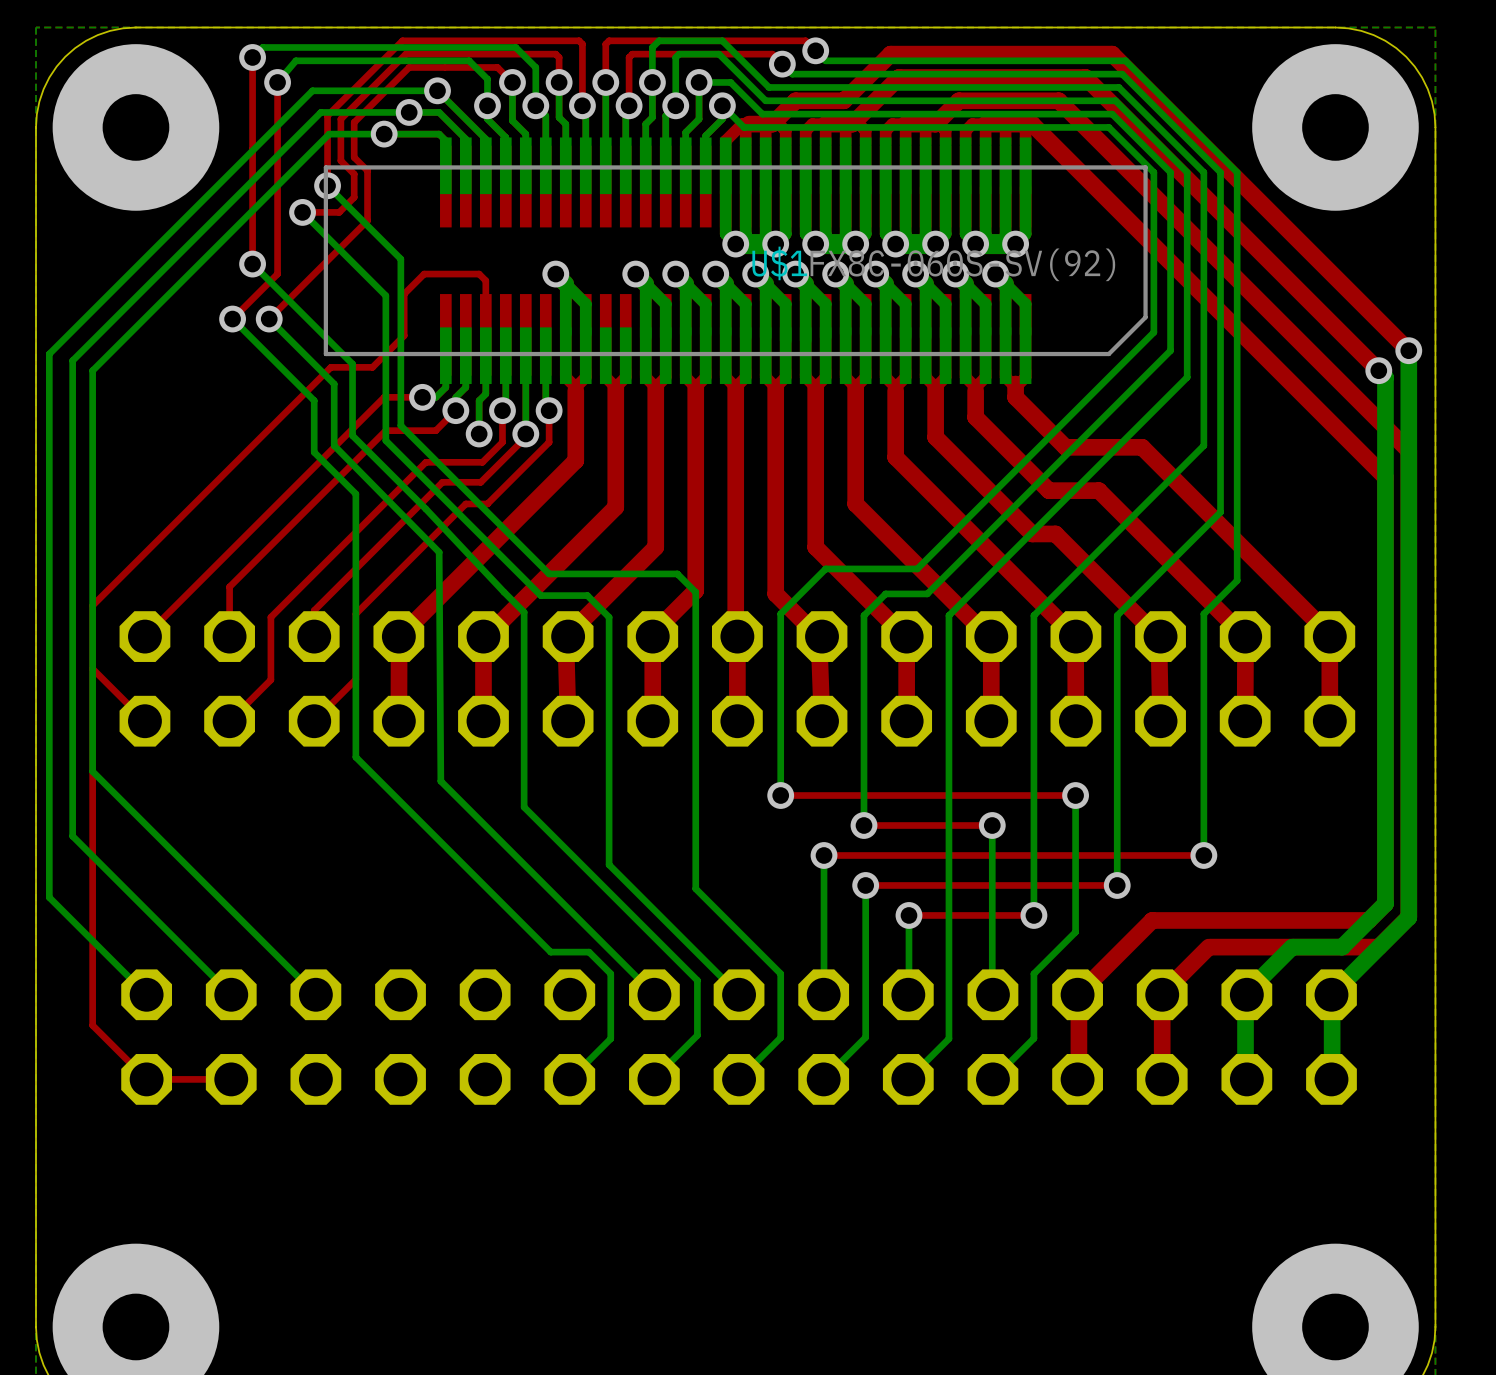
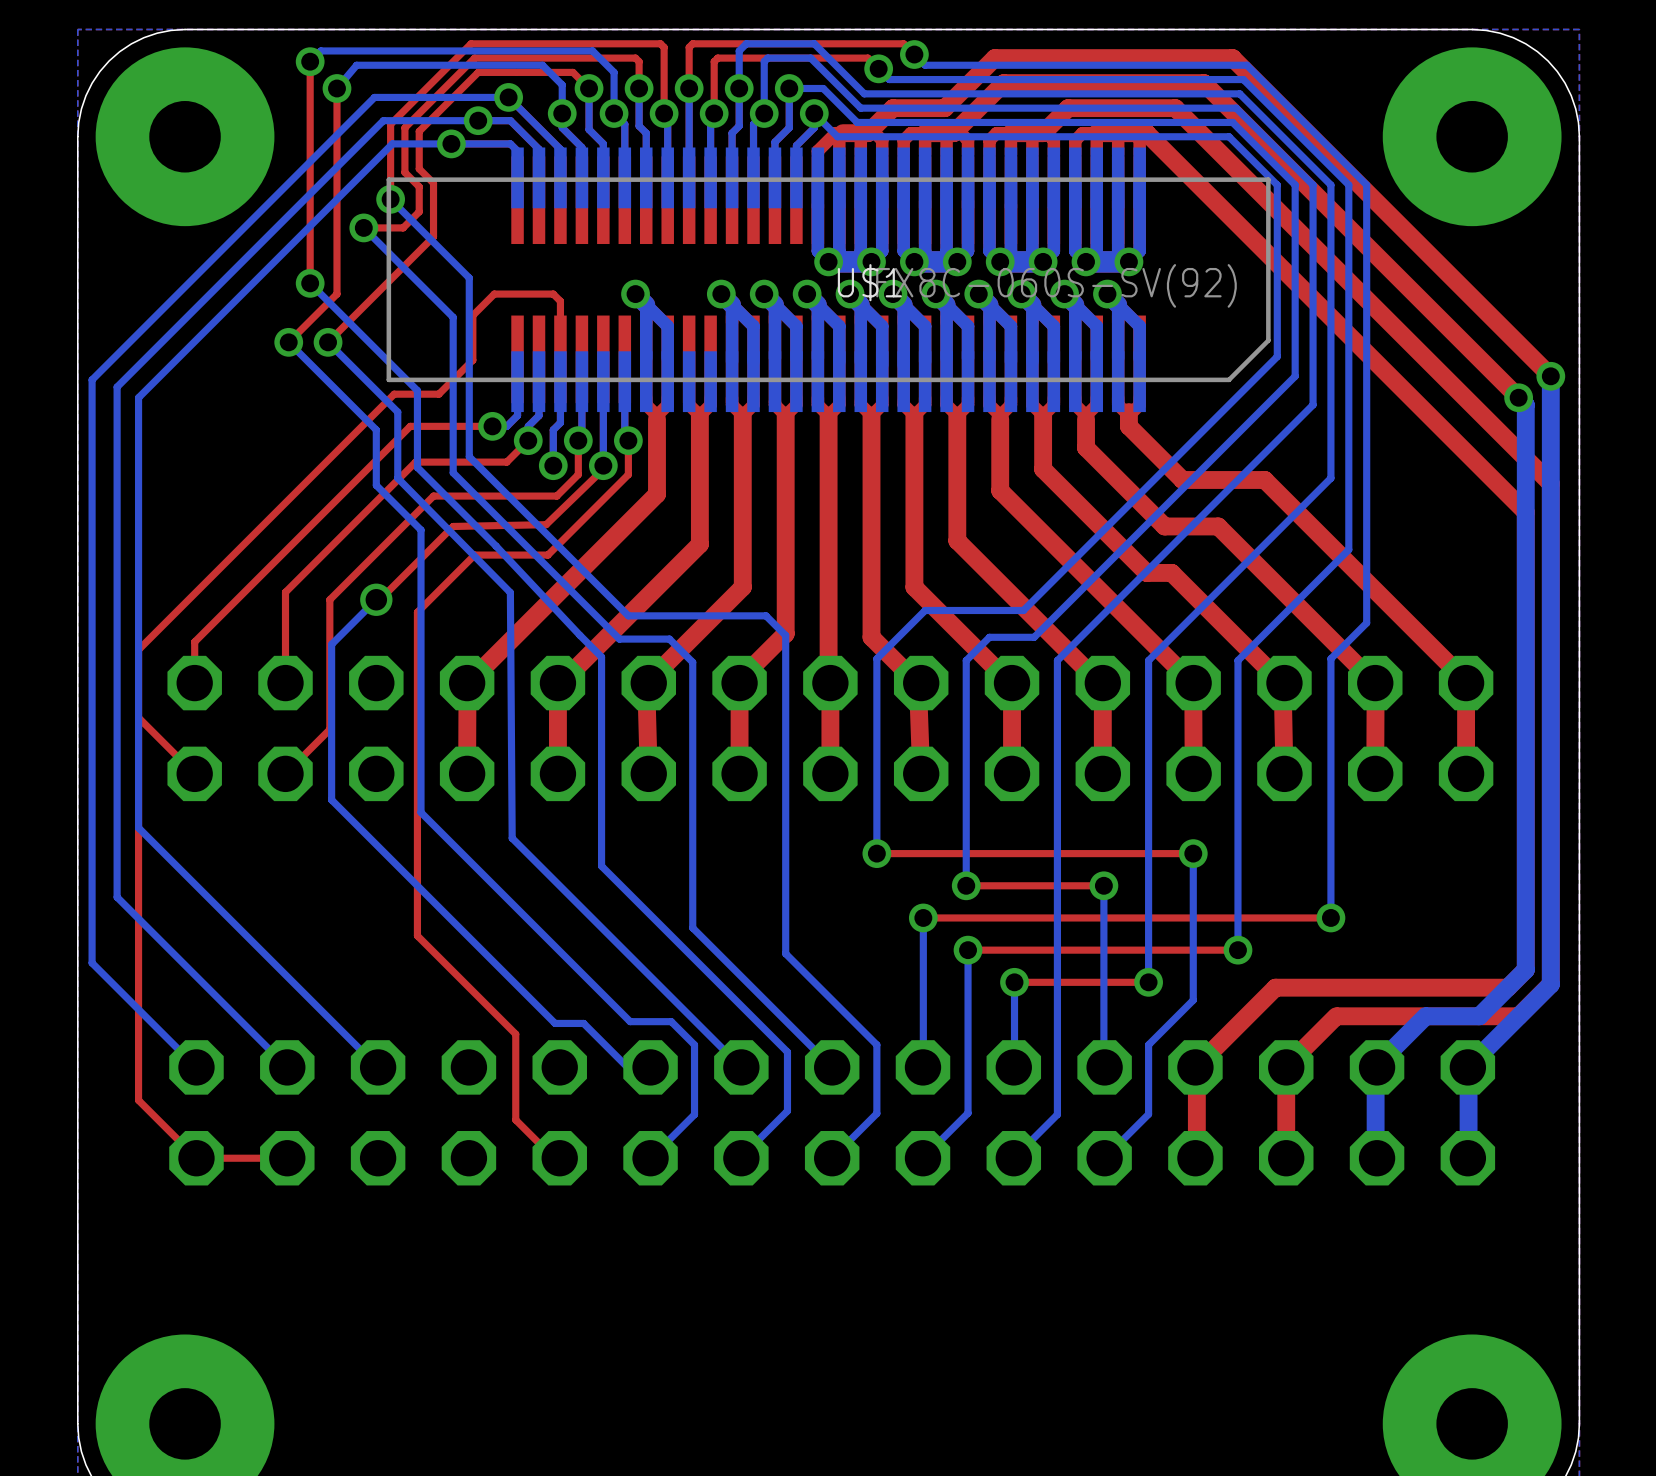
top track: (384, 397) (350, 430) -> (453, 462) (415, 462)
top track: none -> (451, 426) (410, 426) (194, 641) (194, 683)
top track: (385, 430) (229, 586) -> none
top track: (525, 437) (480, 482) (442, 482) (314, 610) (314, 636) -> (603, 469) (546, 524) (453, 526) (379, 599) (376, 599)
top track: (425, 462) (270, 617) -> (496, 496) (433, 496) (329, 599) (329, 662)
top track: (487, 503) (465, 503) (355, 613) (355, 679) (314, 721) -> (562, 540) (547, 555) (474, 555) (417, 612) (417, 935) (515, 1034) (515, 1119) (554, 1158) (559, 1158)
top track: (229, 551) (144, 636) -> (285, 592) (285, 629)
bottom track: none -> (376, 599) (331, 644) (331, 799) (555, 1023) (583, 1023) (627, 1067) (650, 1067)
via: none -> (376, 599)

